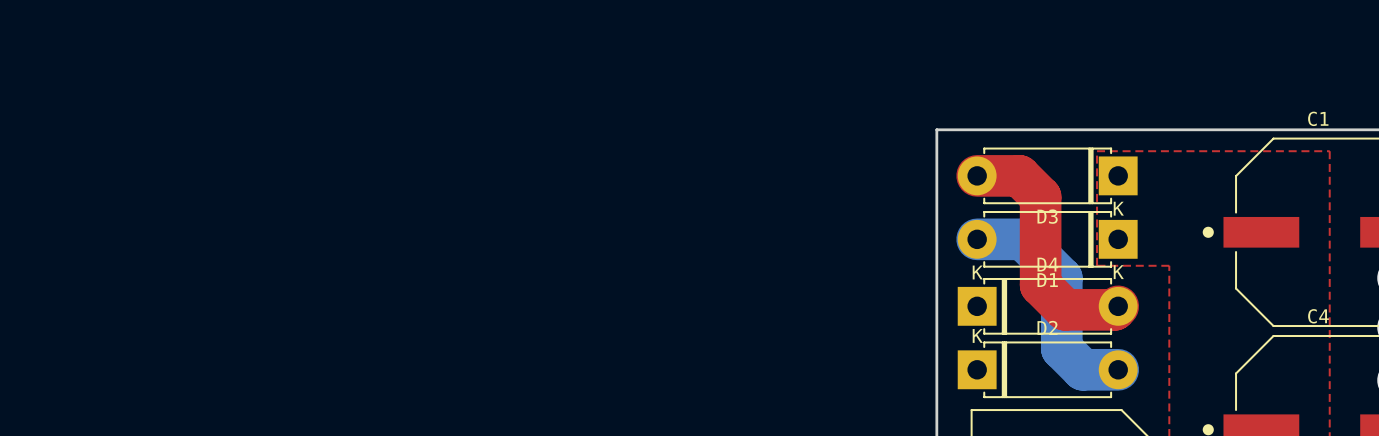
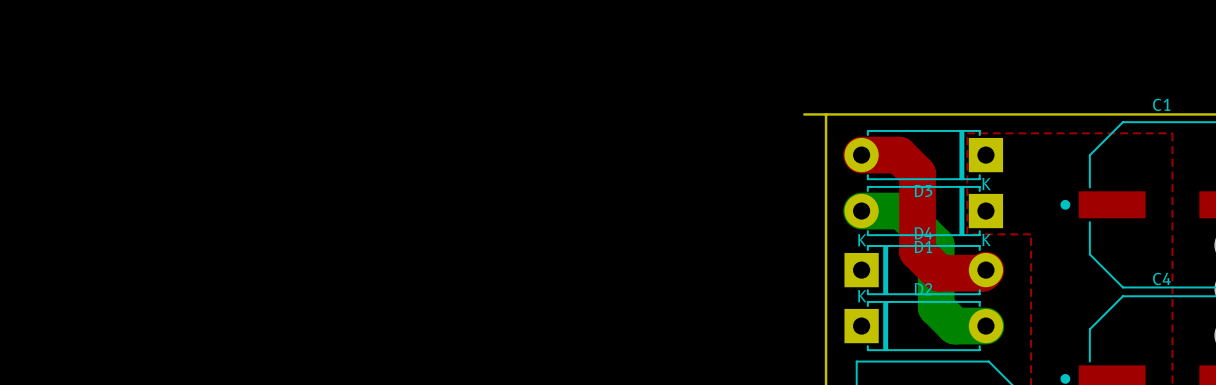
board edge: none -> (804, 114) (826, 114)

